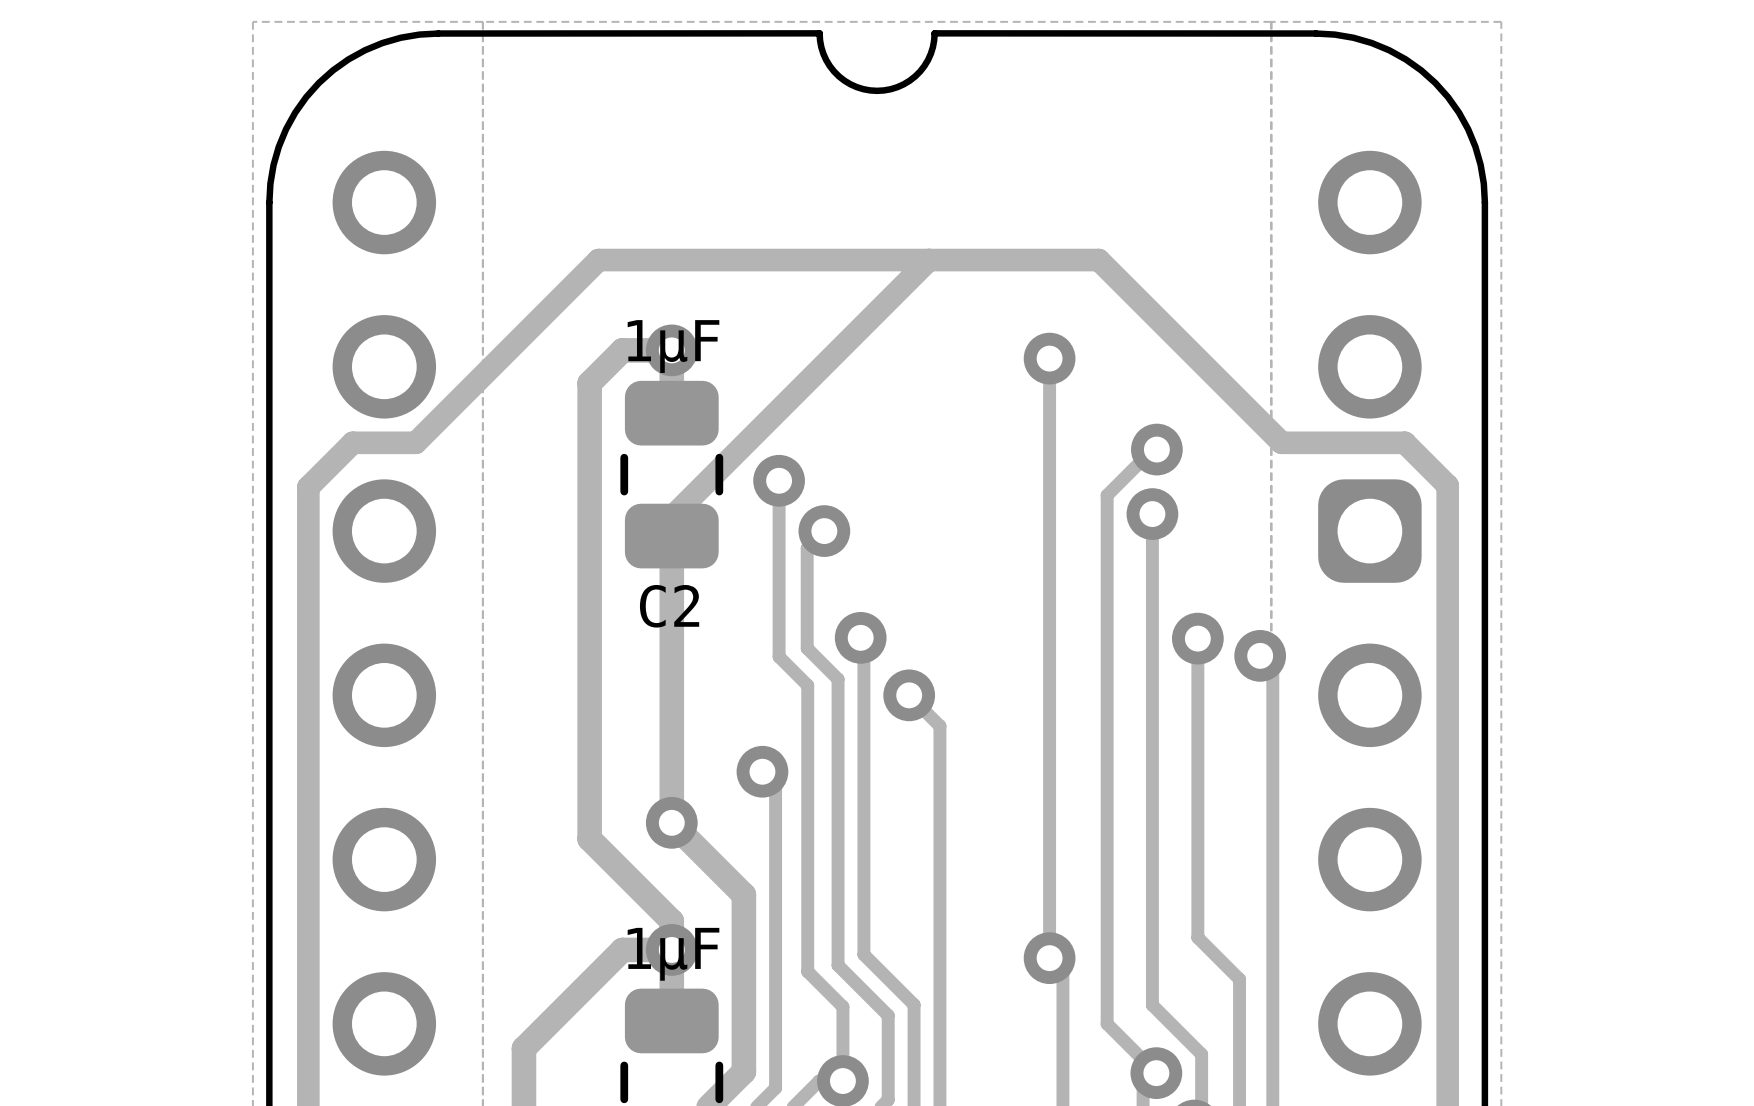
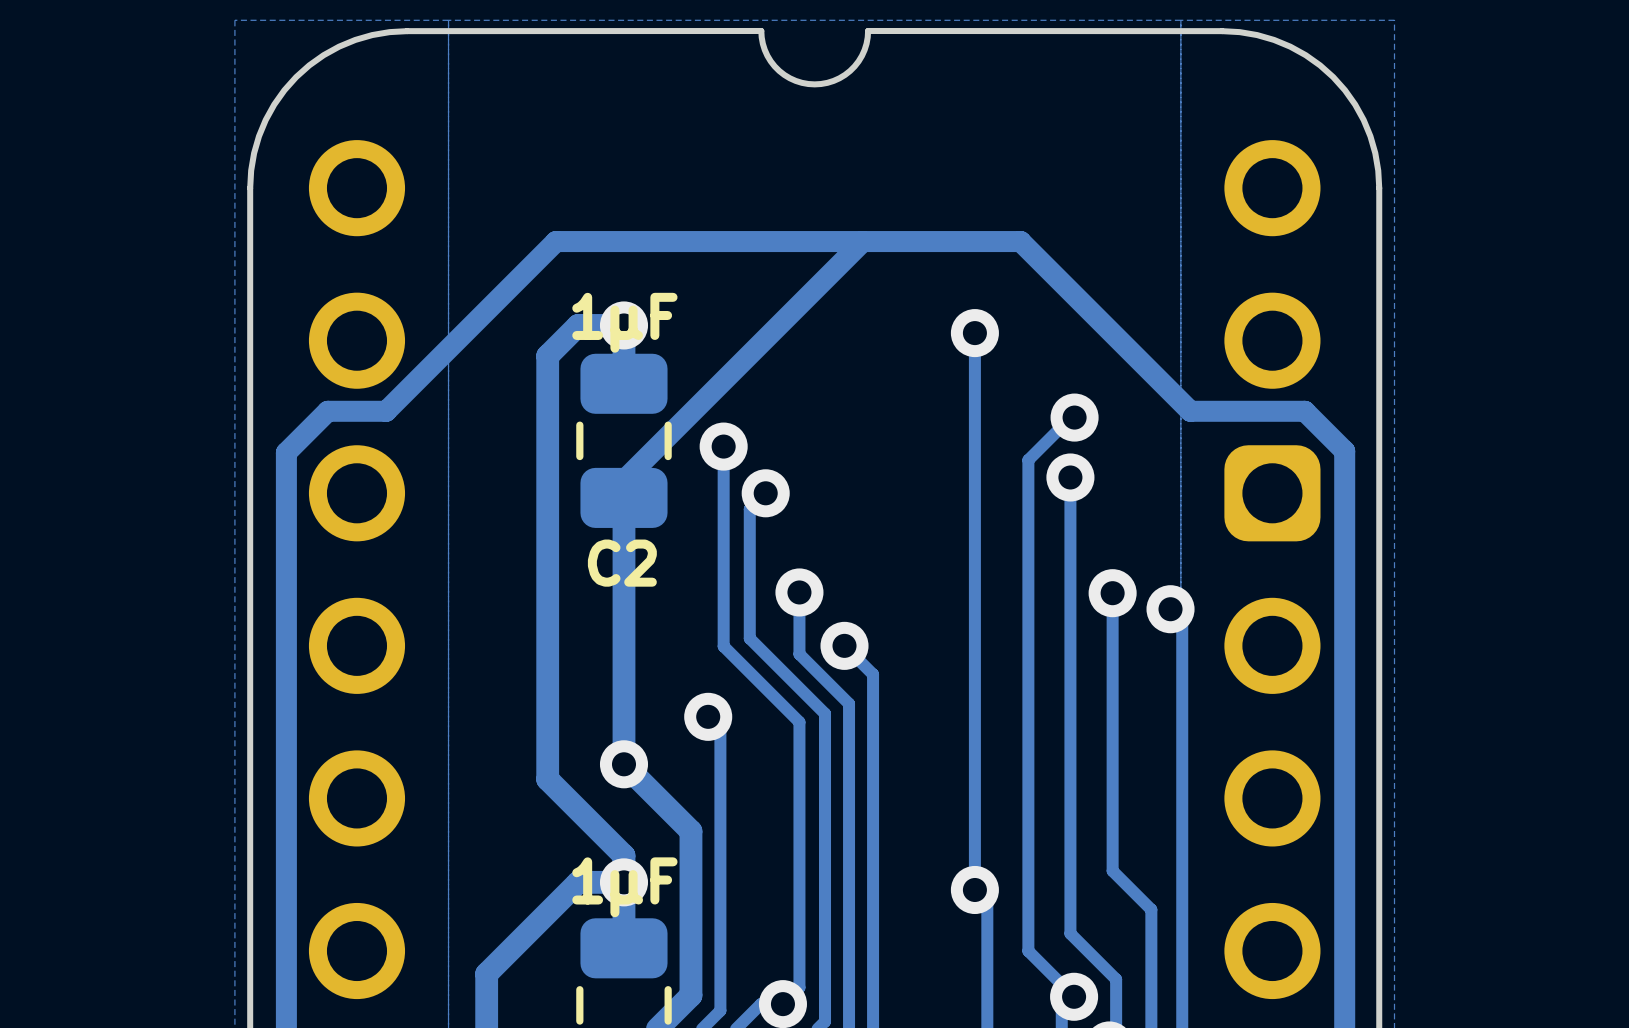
track: (860, 637) (863, 641) (863, 954) (914, 1004) -> (799, 592) (799, 654) (849, 703) (849, 933)
track: (807, 648) (838, 679) (838, 965) (888, 1015) -> (749, 602) (749, 638) (825, 713) (825, 943)
track: (779, 656) (807, 685) (807, 971) (842, 1006) (842, 1081) -> (723, 610) (723, 646) (799, 722) (799, 987) (782, 1004)

